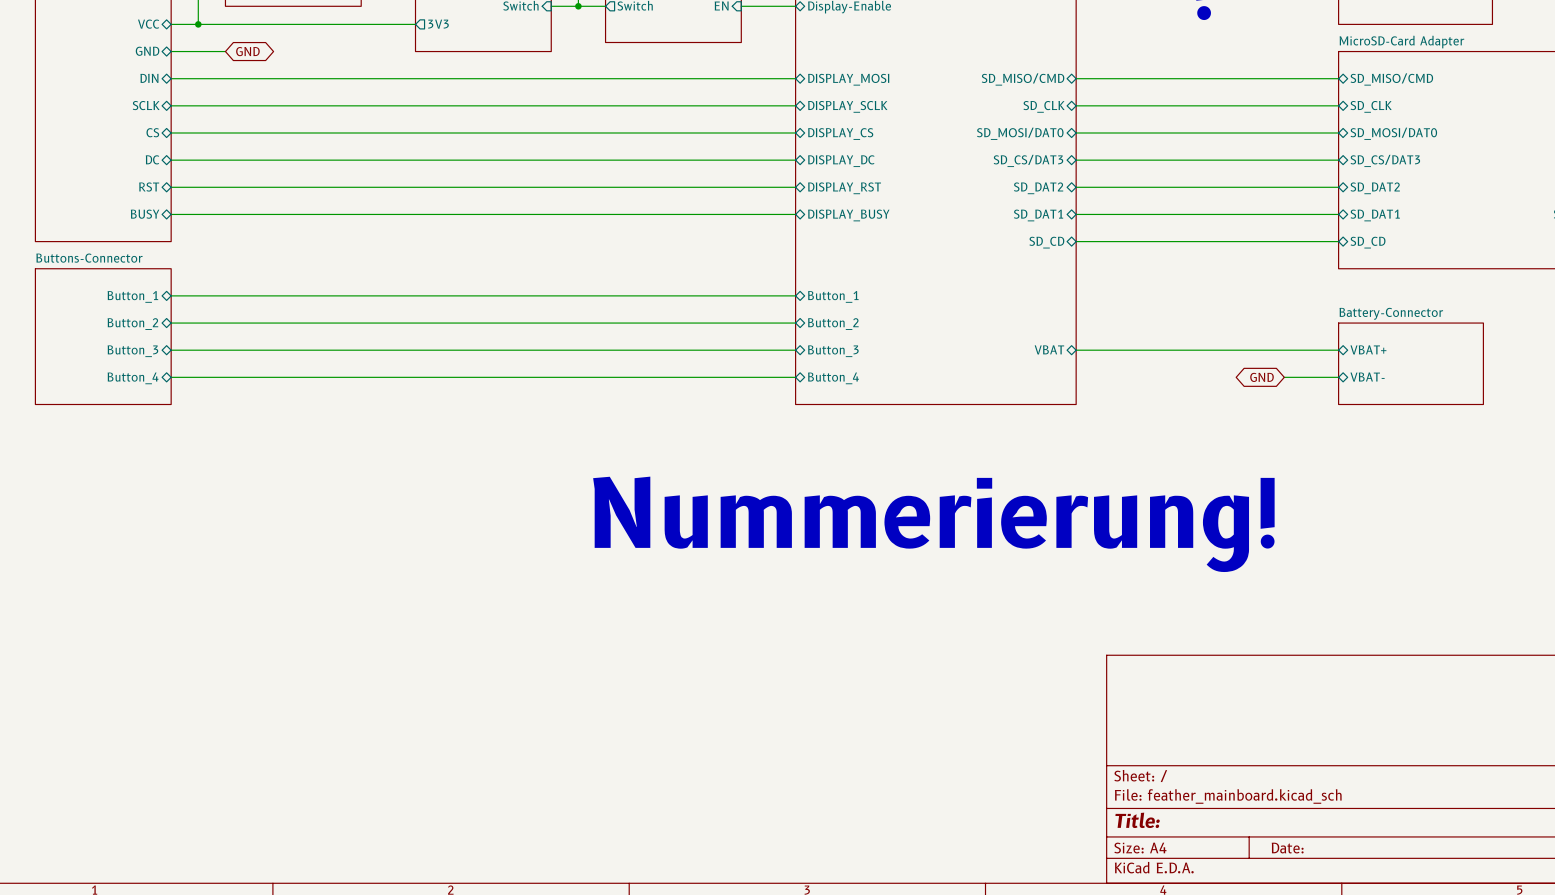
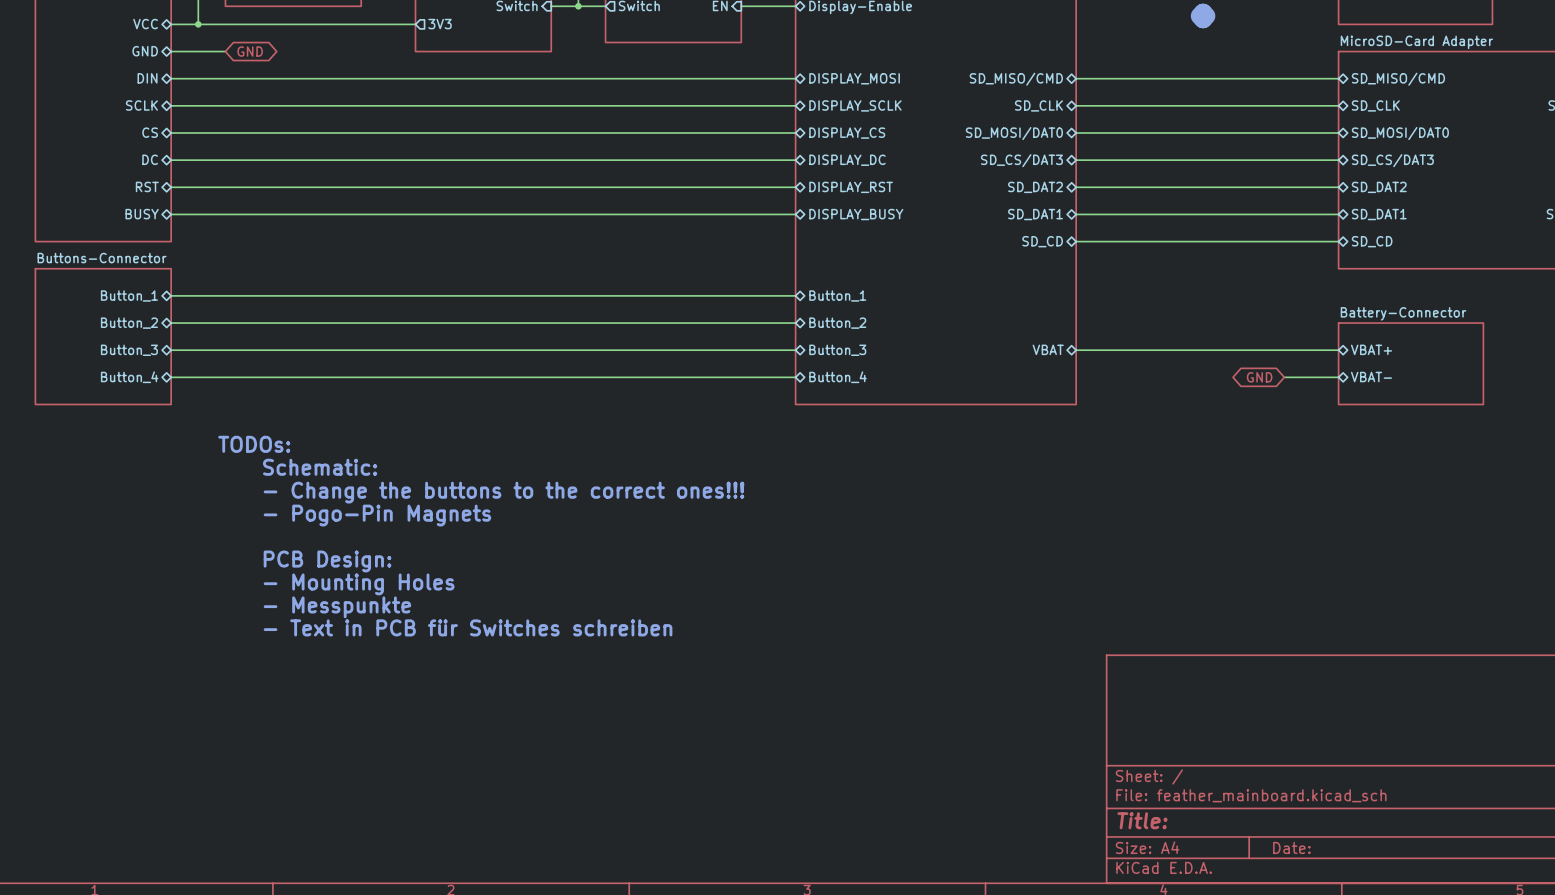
text: none -> TODOs: (254, 444)
text: none -> Schematic: (320, 467)
text: none -> - Change the buttons to the correct ones!!! (504, 492)
text: none -> - Pogo-Pin Magnets (377, 515)
text: Nummerierung! (933, 524) -> none
text: none -> PCB Design: (327, 561)
text: none -> - Mounting Holes (359, 584)
text: none -> - Messpunkte (337, 607)
text: none -> - Text in PCB für Switches schreiben (468, 627)

